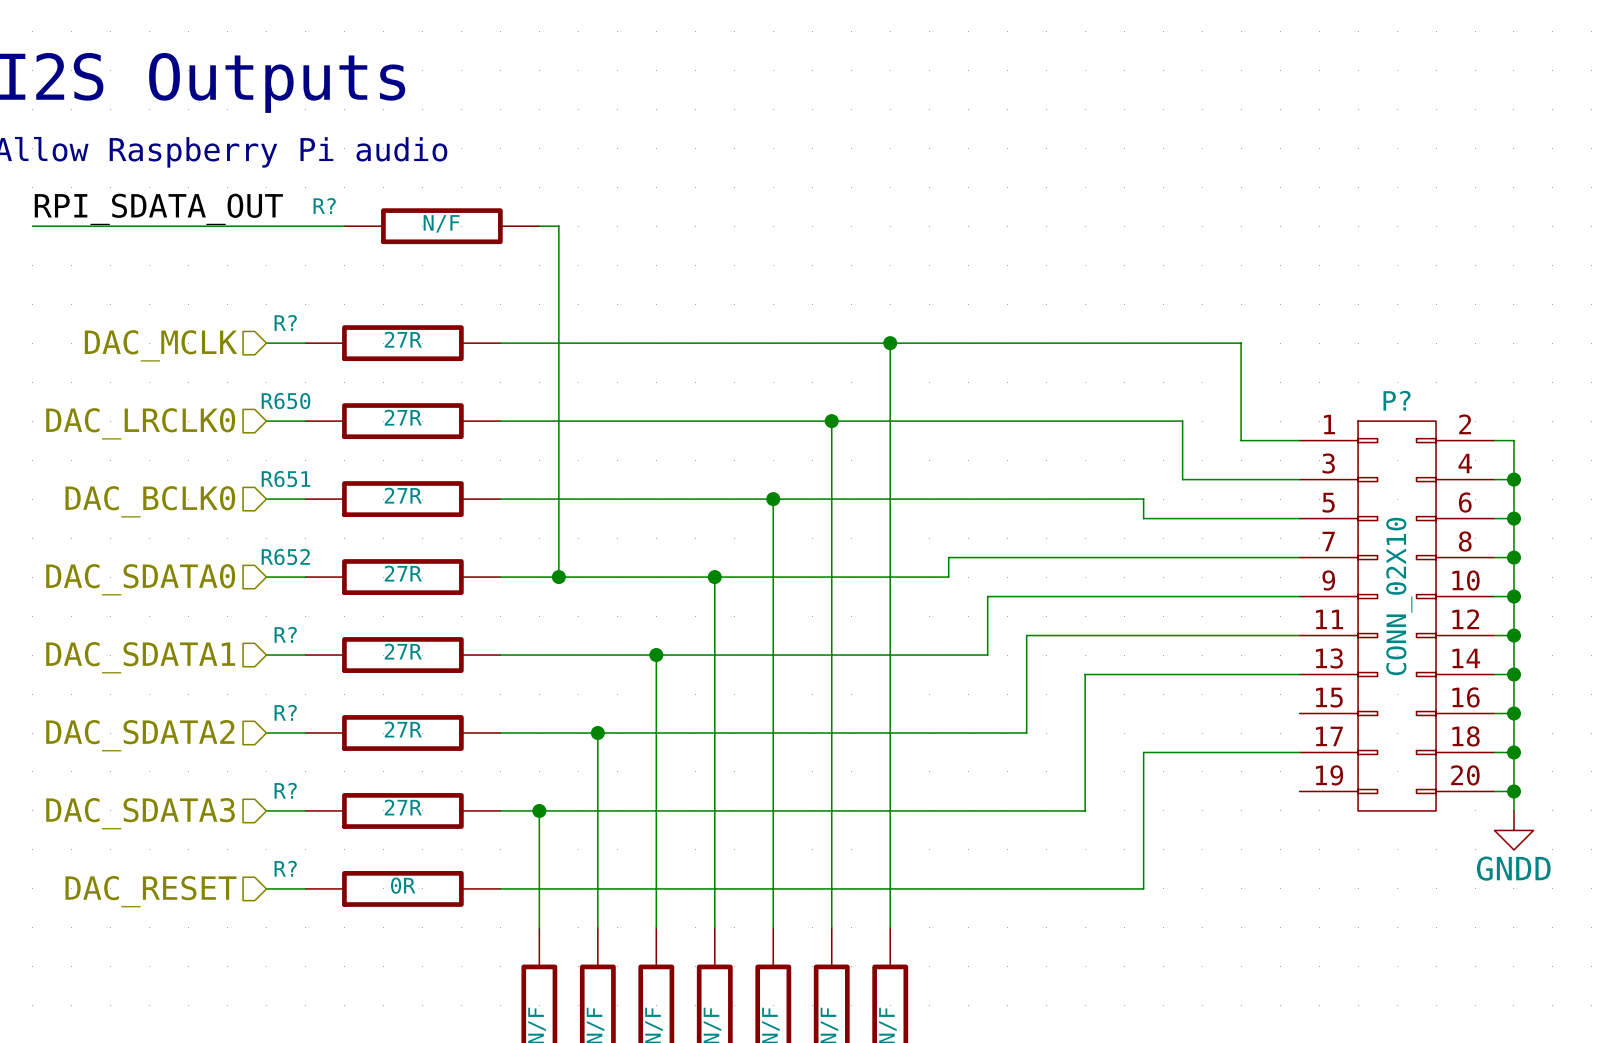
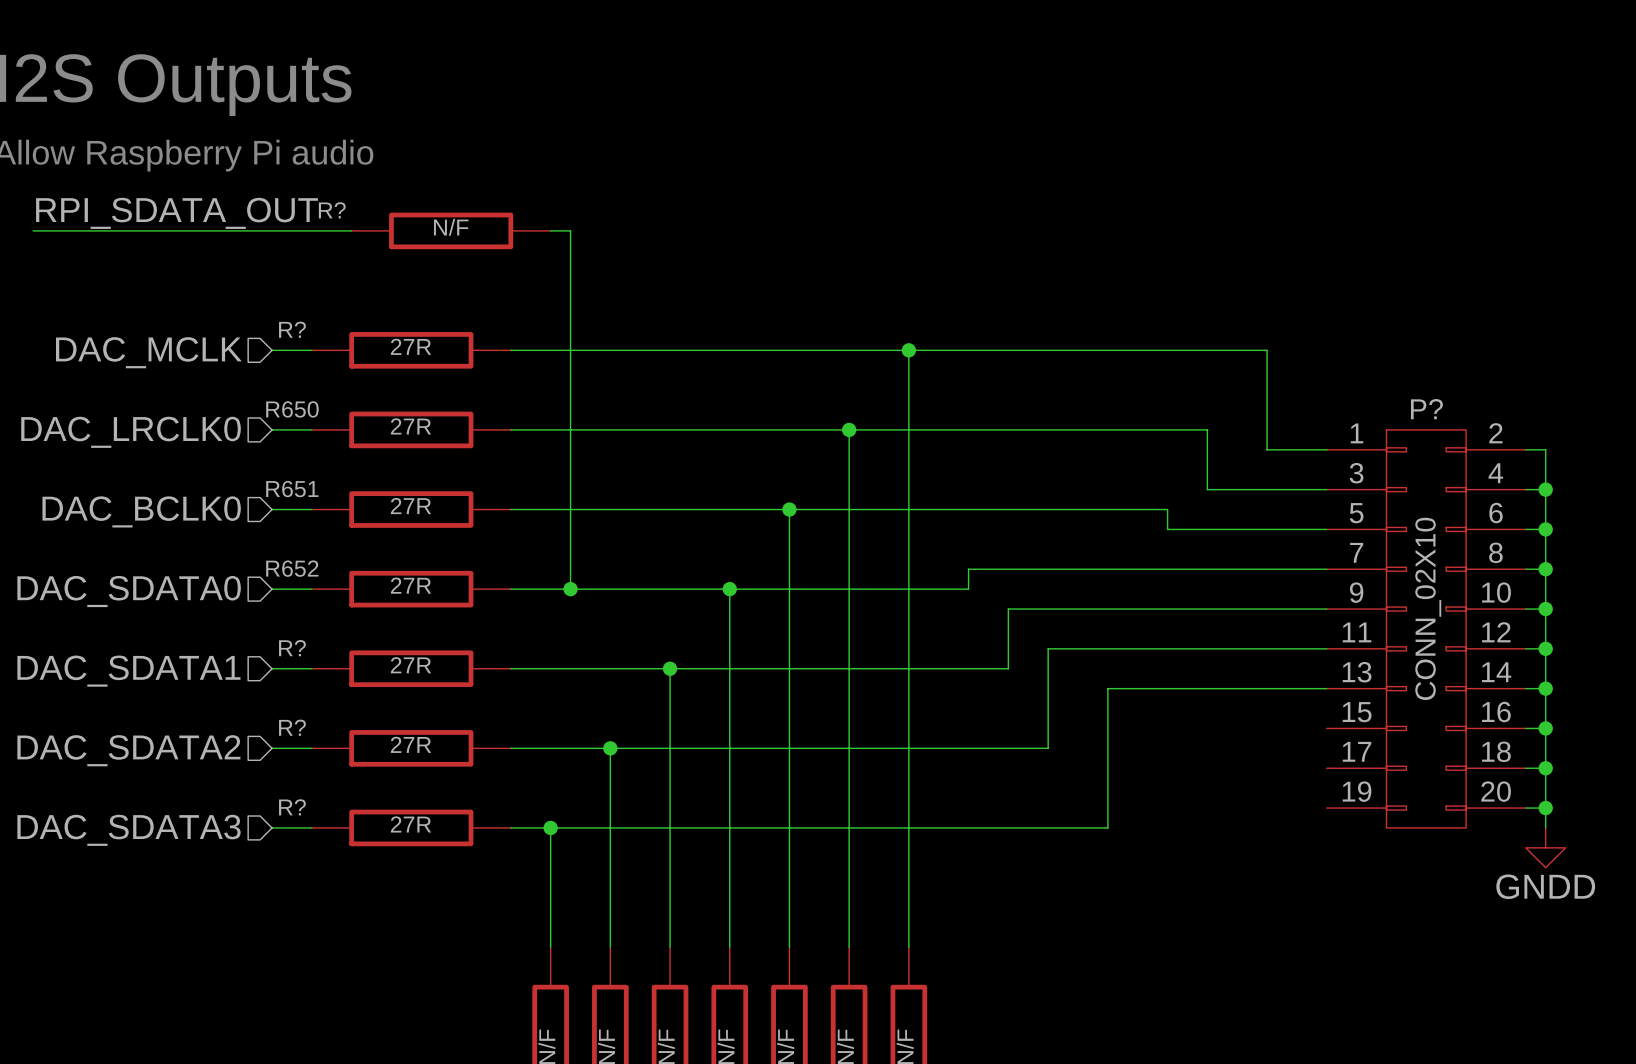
wire: (1299, 752) (1143, 752) (1143, 888) (500, 888) -> none
wire: (266, 888) (305, 888) -> none
R?: 0R (402, 888) -> none
hierarchical label: DAC_RESET (151, 891) -> none

